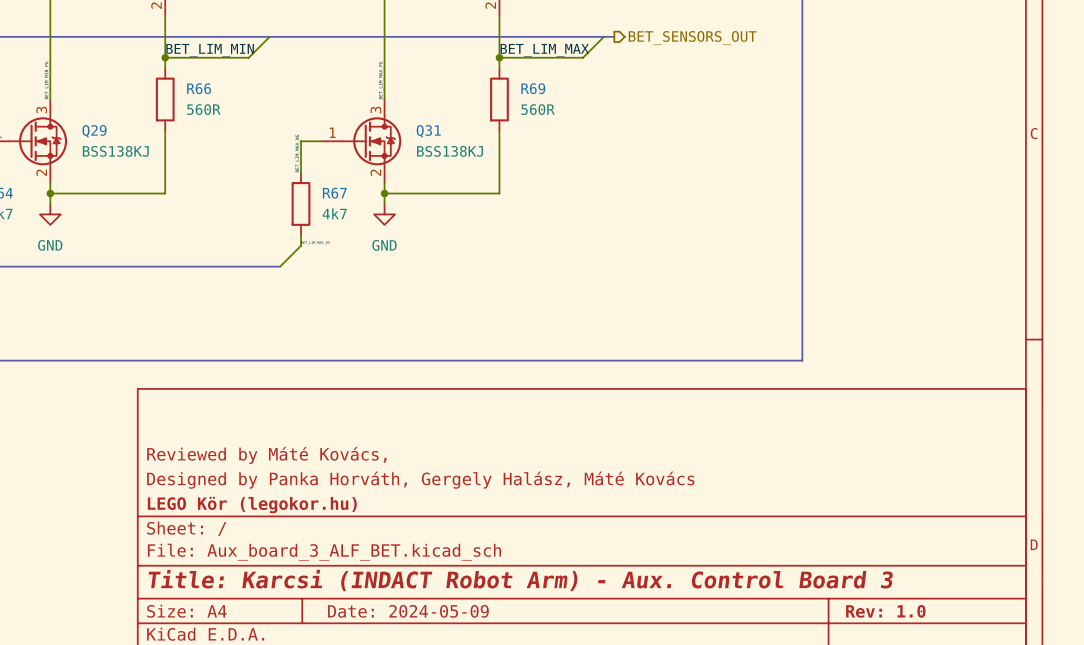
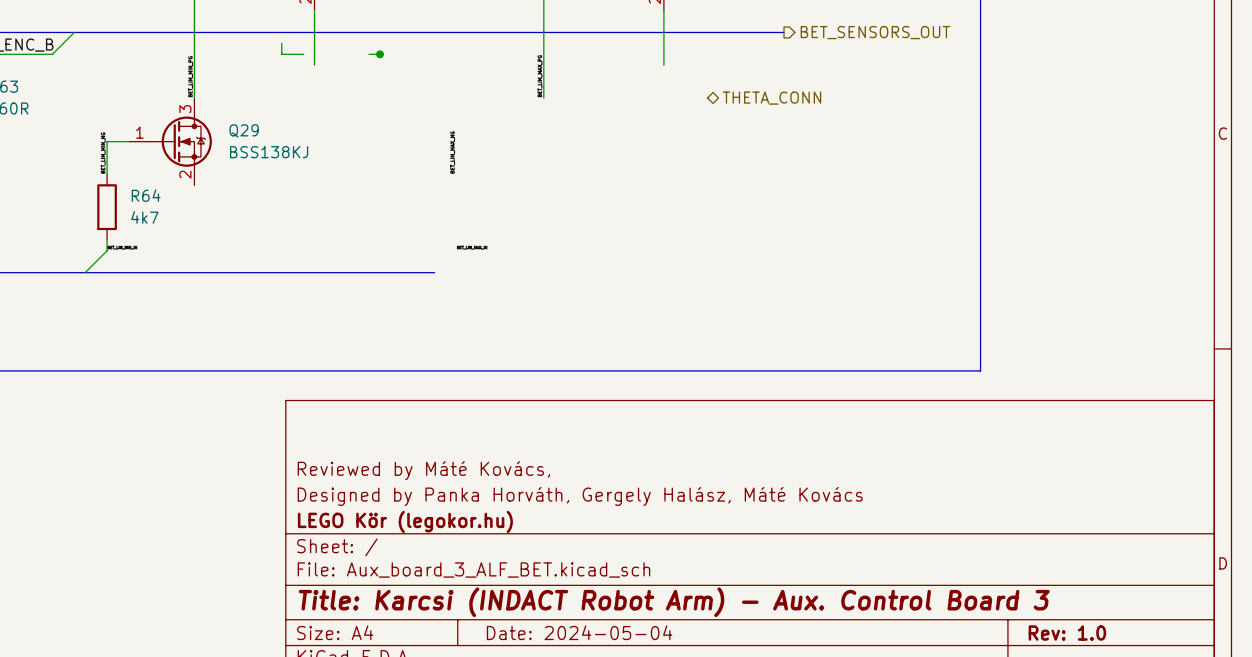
wire: (269, 36) (248, 57) (227, 57) -> none
wire: (603, 36) (583, 57) (499, 57) -> none
wire: none -> (281, 43) (281, 54) (303, 54)
label: BET_LIM_MIN (210, 50) -> none
label: BET_LIM_MAX (544, 50) -> none
wire: (165, 57) (217, 57) -> none
junction: (165, 57) -> none
junction: none -> (380, 54)
junction: (499, 57) -> none
R66: 560R (165, 99) -> none
R69: 560R (499, 99) -> none
hierarchical label: none -> THETA_CONN (771, 98)
wire: (165, 130) (165, 193) (50, 193) -> none
wire: (499, 130) (499, 193) (384, 193) -> none
wire: (321, 141) (301, 141) (301, 172) -> none
Q31: BSS138KJ (361, 141) -> none
wire: (50, 183) (50, 203) -> none
wire: (384, 183) (384, 203) -> none
junction: (50, 193) -> none
junction: (384, 193) -> none
R67: 4k7 (301, 203) -> none
power symbol: GND (50, 214) -> none
power symbol: GND (384, 214) -> none
wire: (301, 235) (301, 245) (280, 266) -> none
title block: Date: 2024-05-09 (408, 611) -> Date: 2024-05-04 (579, 632)

